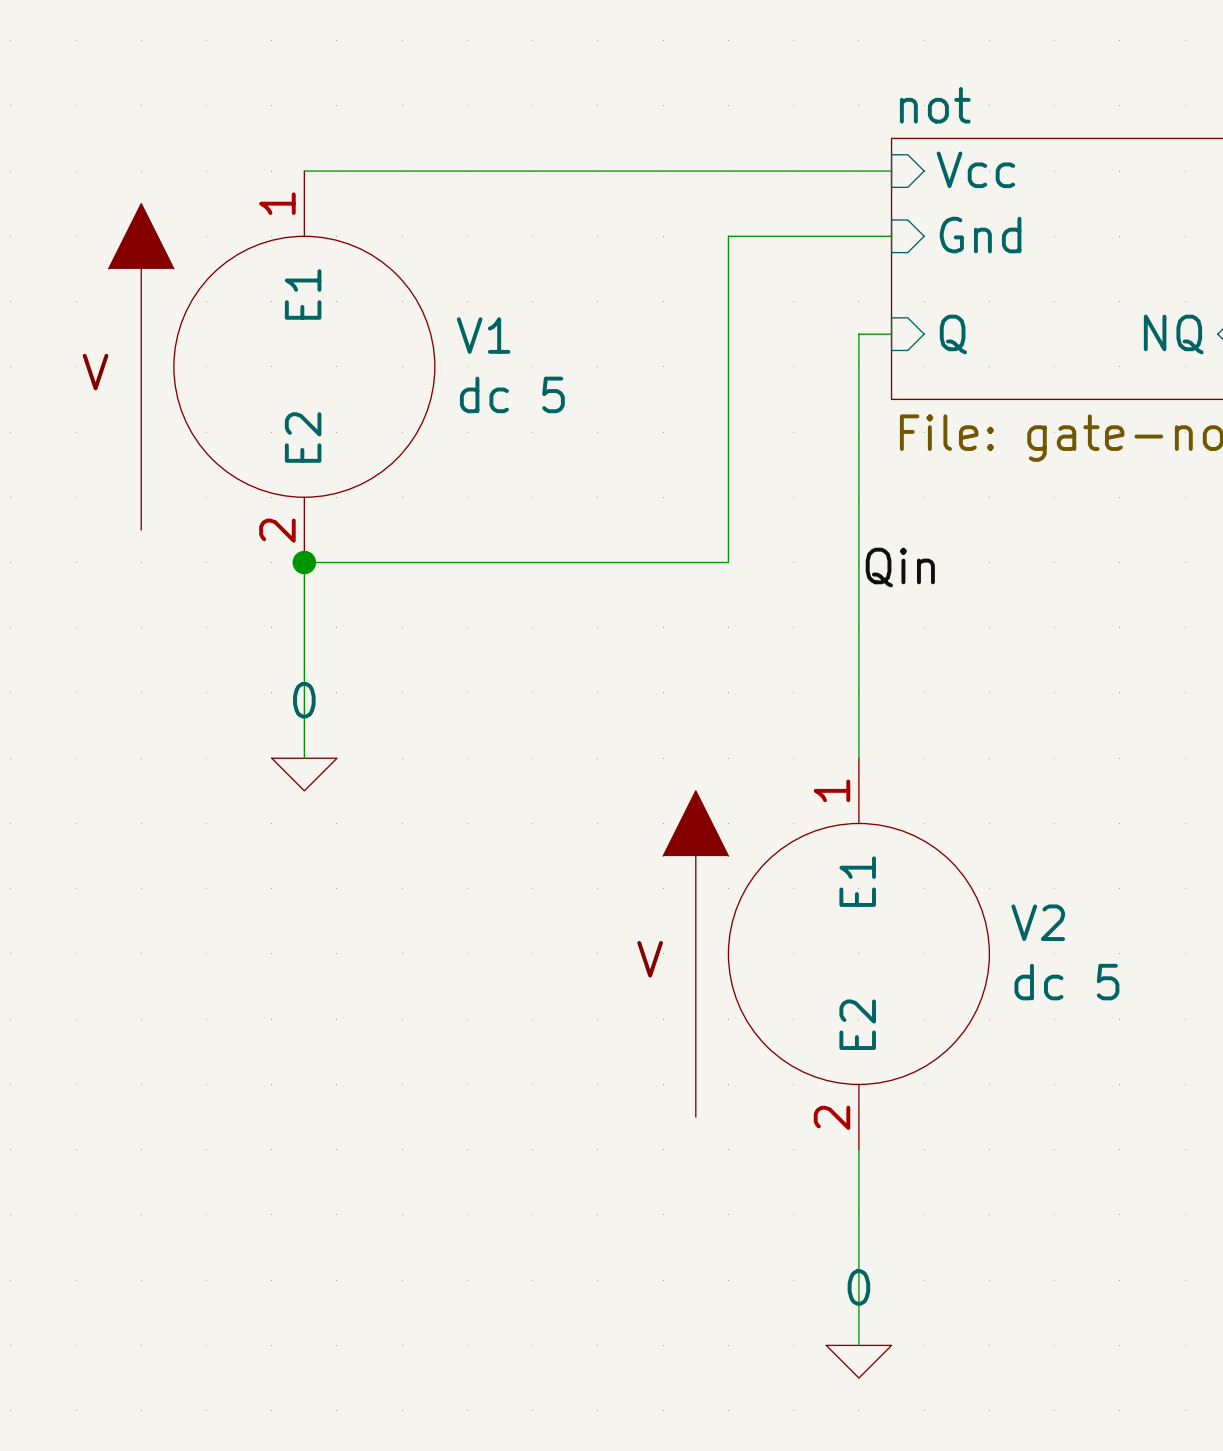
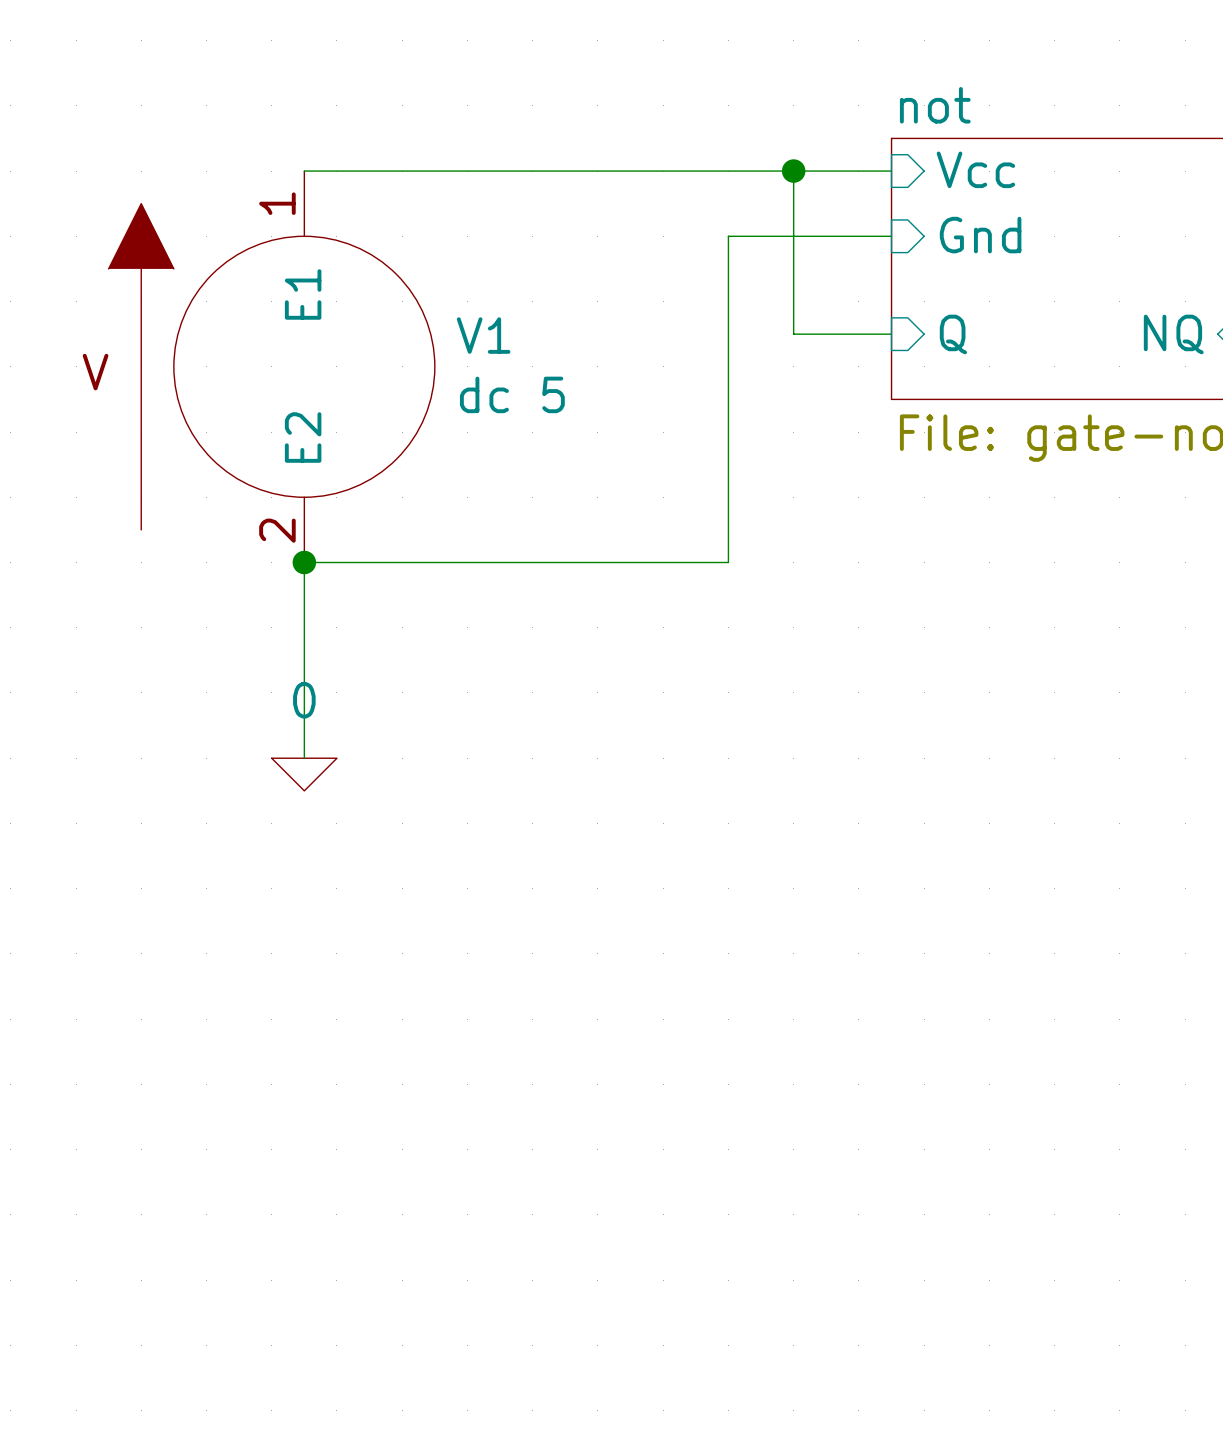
junction: none -> (793, 171)
wire: (858, 334) (858, 758) -> (858, 334) (793, 334) (793, 171)
label: Qin (900, 567) -> none
V2: dc 5 (826, 953) -> none
wire: (858, 1149) (858, 1345) -> none
power symbol: 0 (858, 1361) -> none

